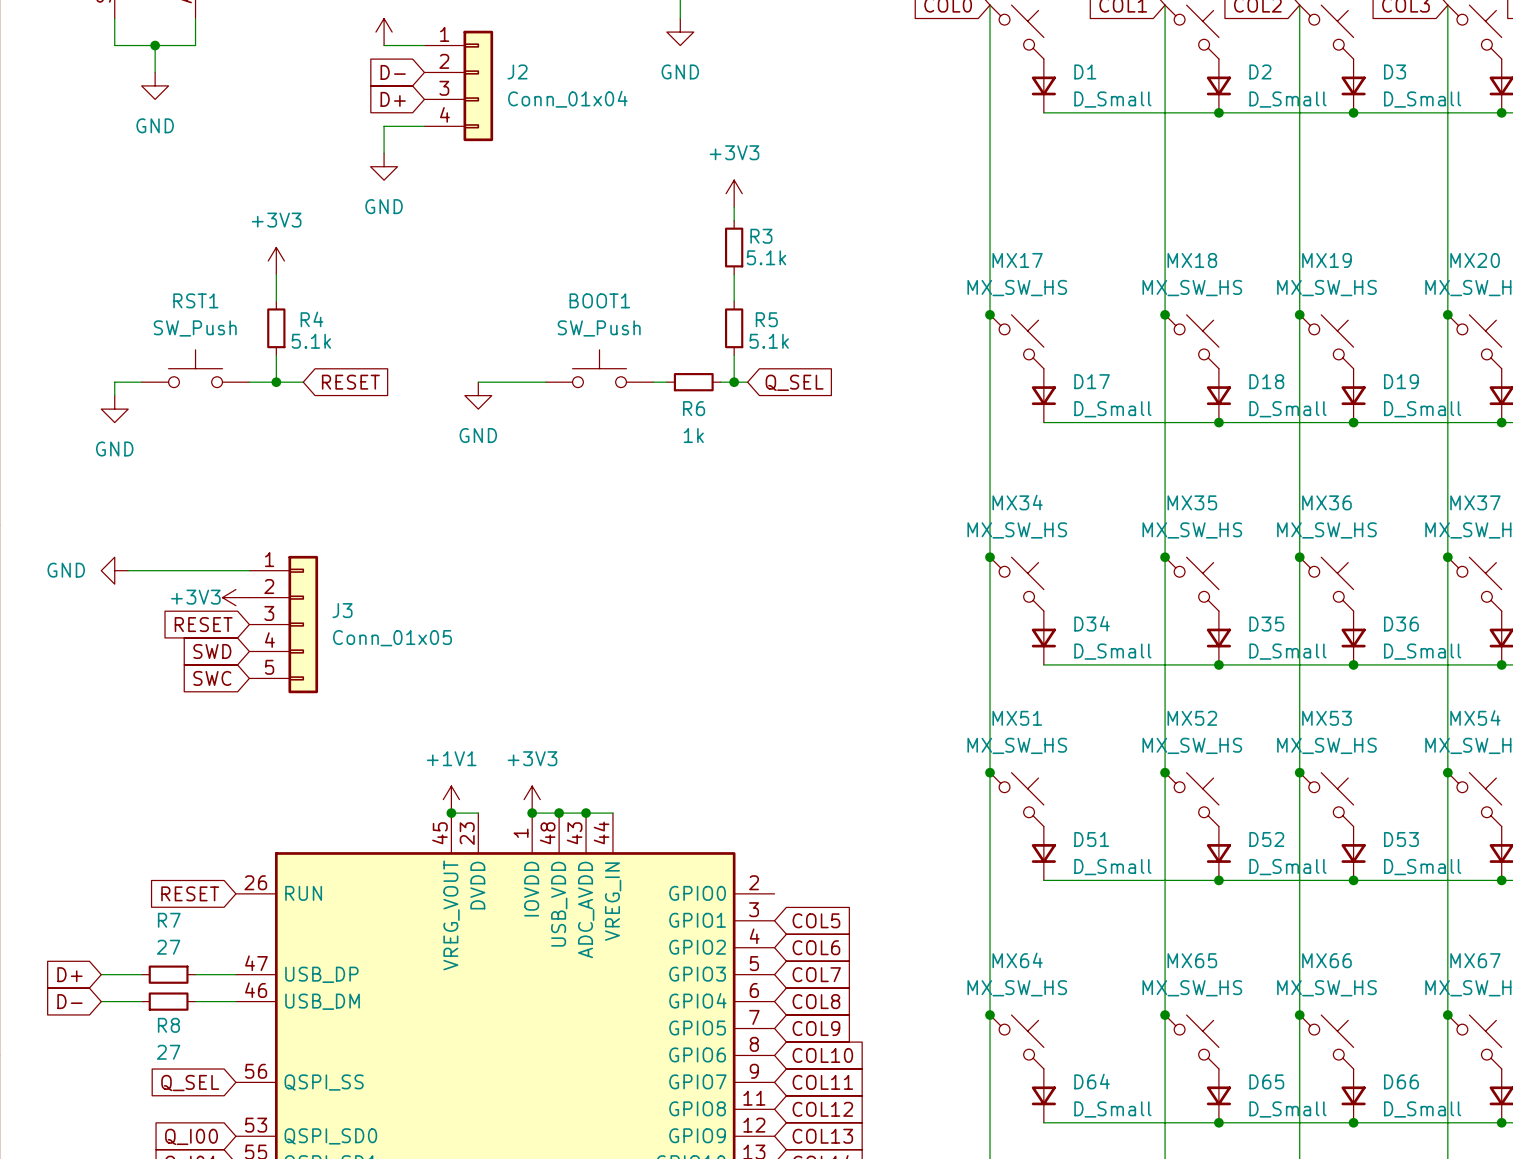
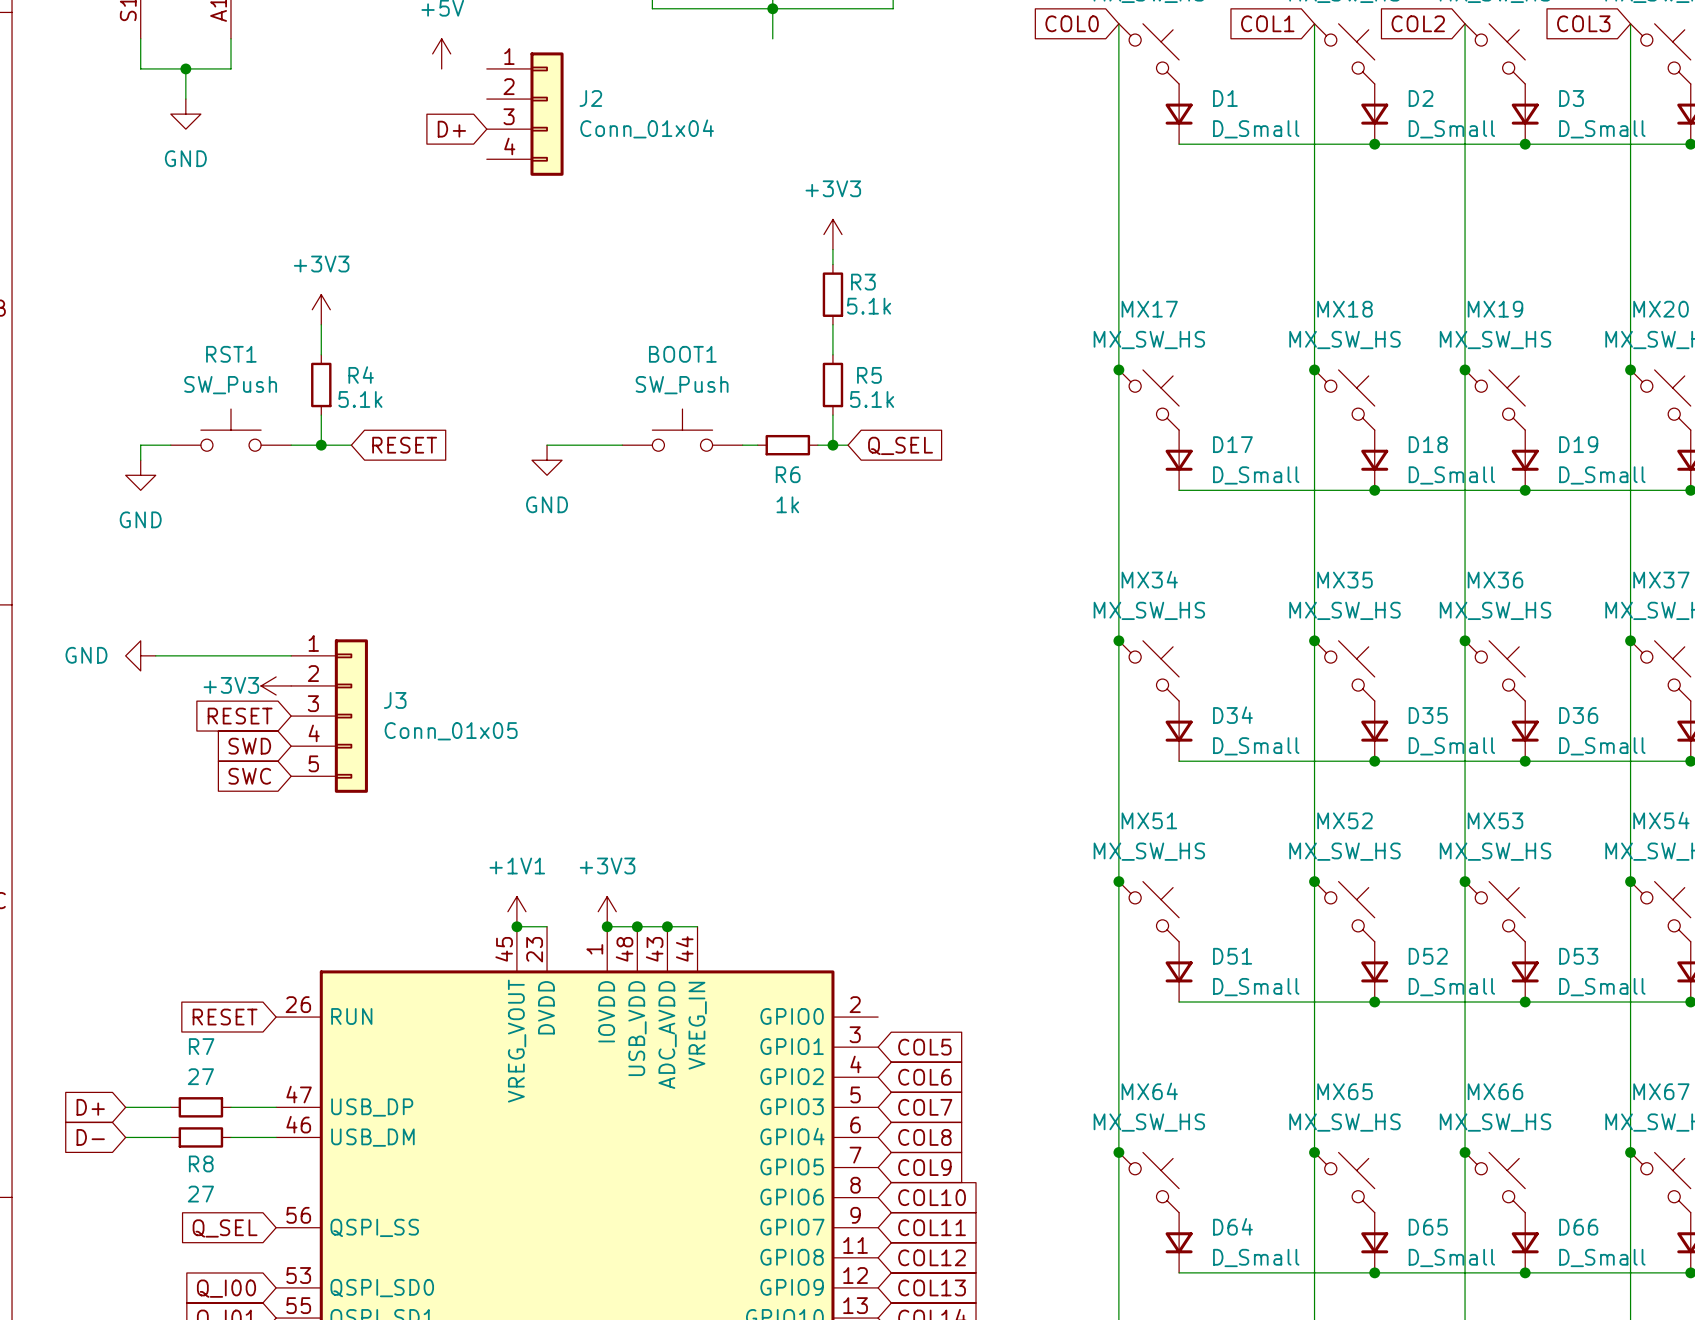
power symbol: GND (680, 32) -> none
wire: (384, 45) (424, 45) -> none
global label: D- (393, 72) -> none
wire: (424, 126) (384, 126) (384, 153) -> none
power symbol: GND (384, 166) -> none

